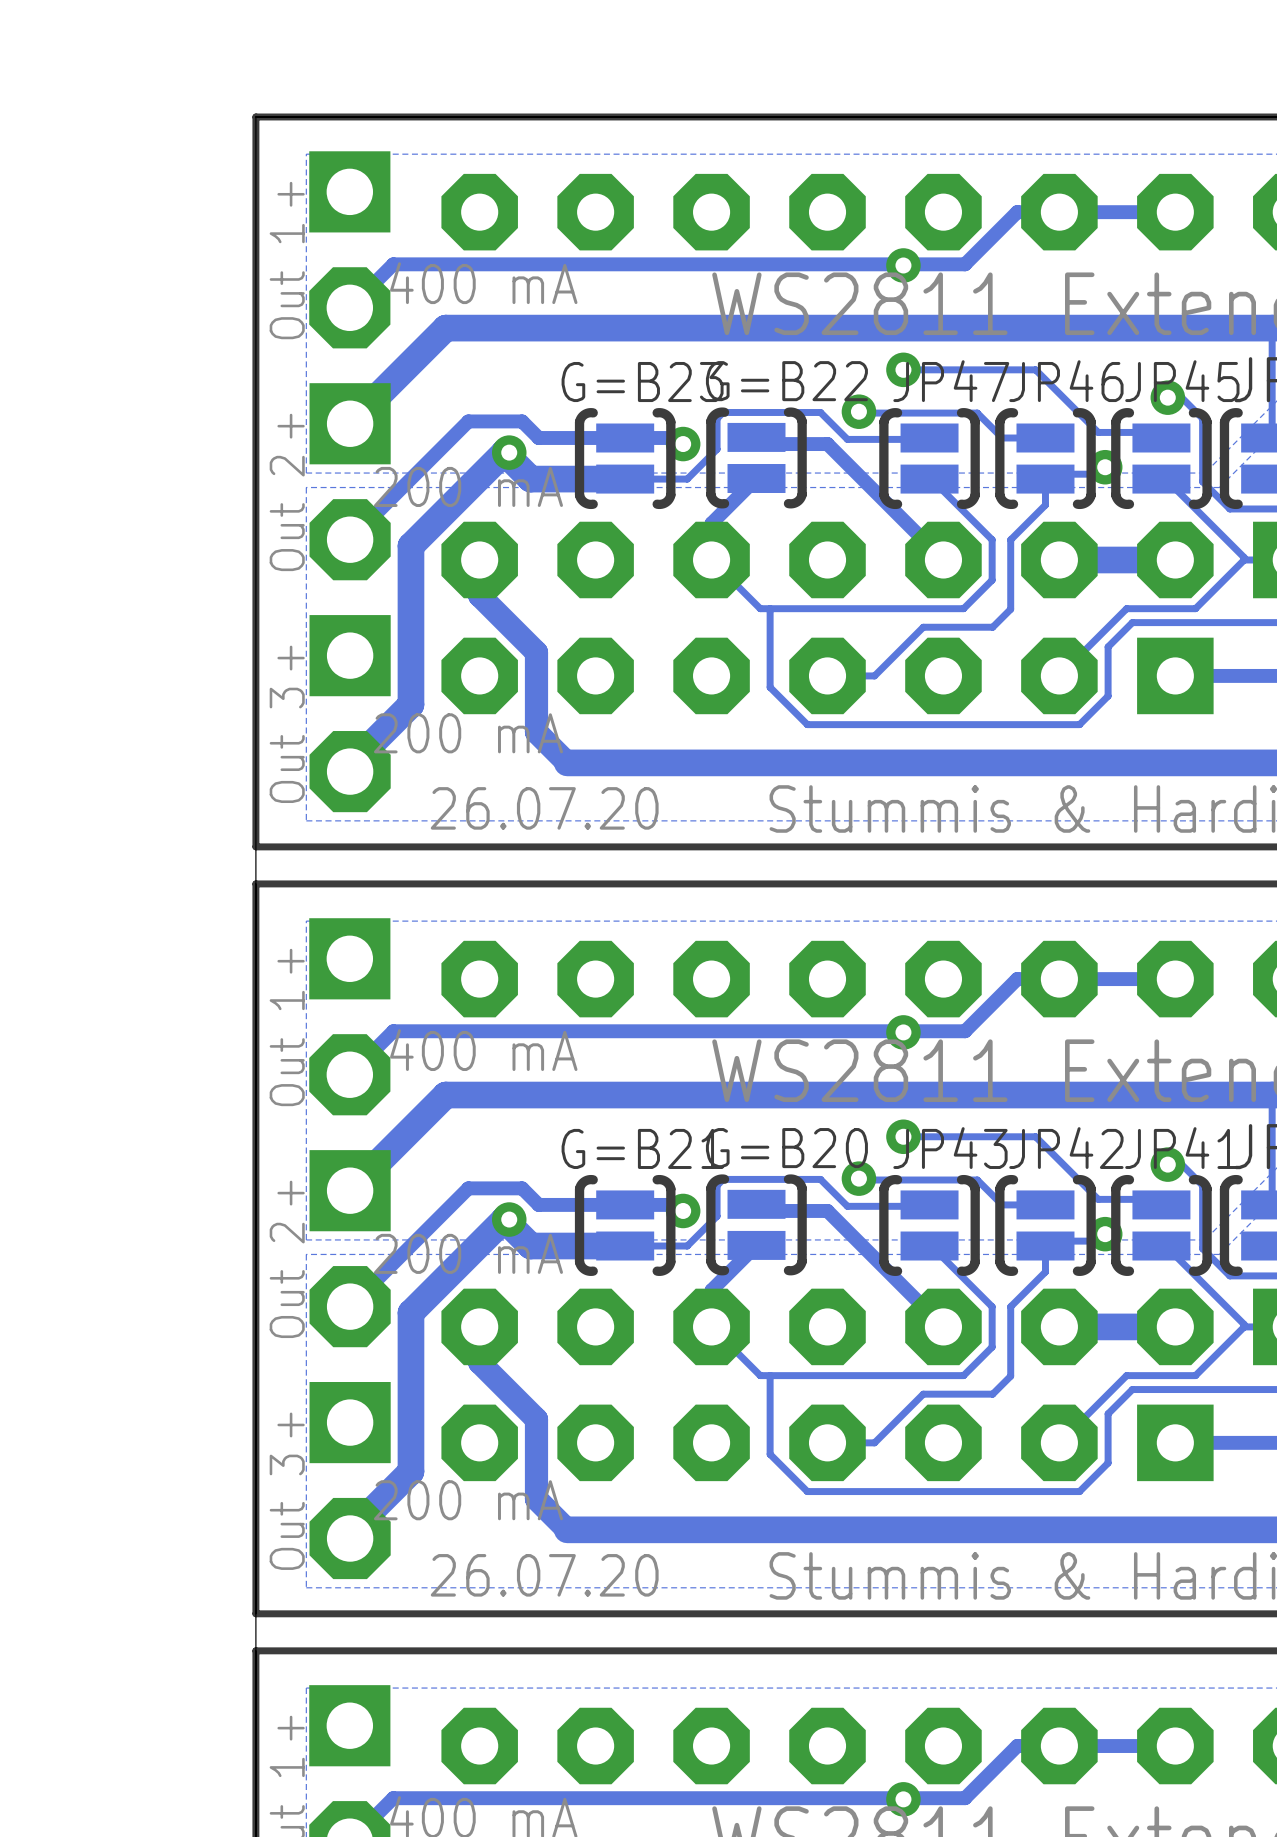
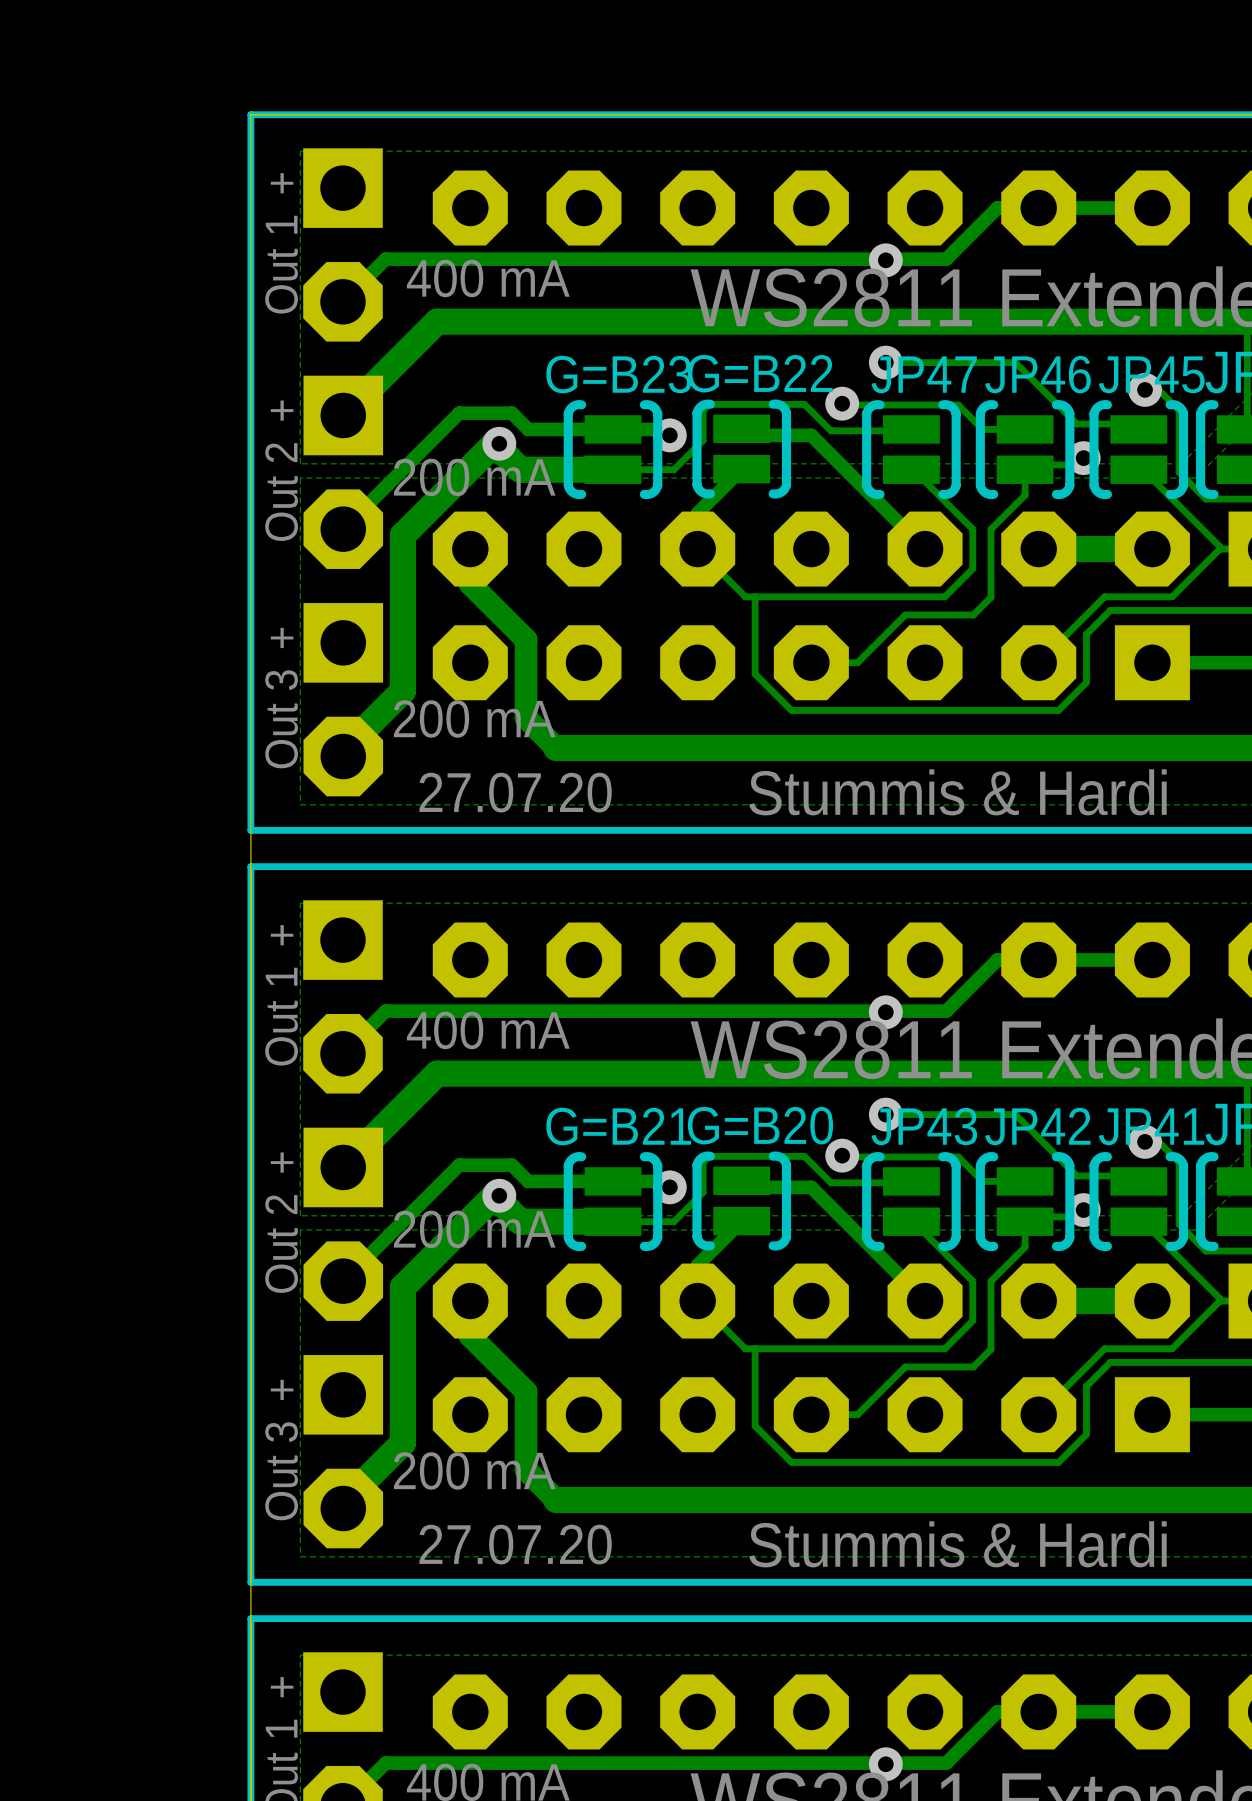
text: 26.07.20 (544, 808) -> 27.07.20 (515, 792)
text: 26.07.20 (544, 1575) -> 27.07.20 (515, 1544)

